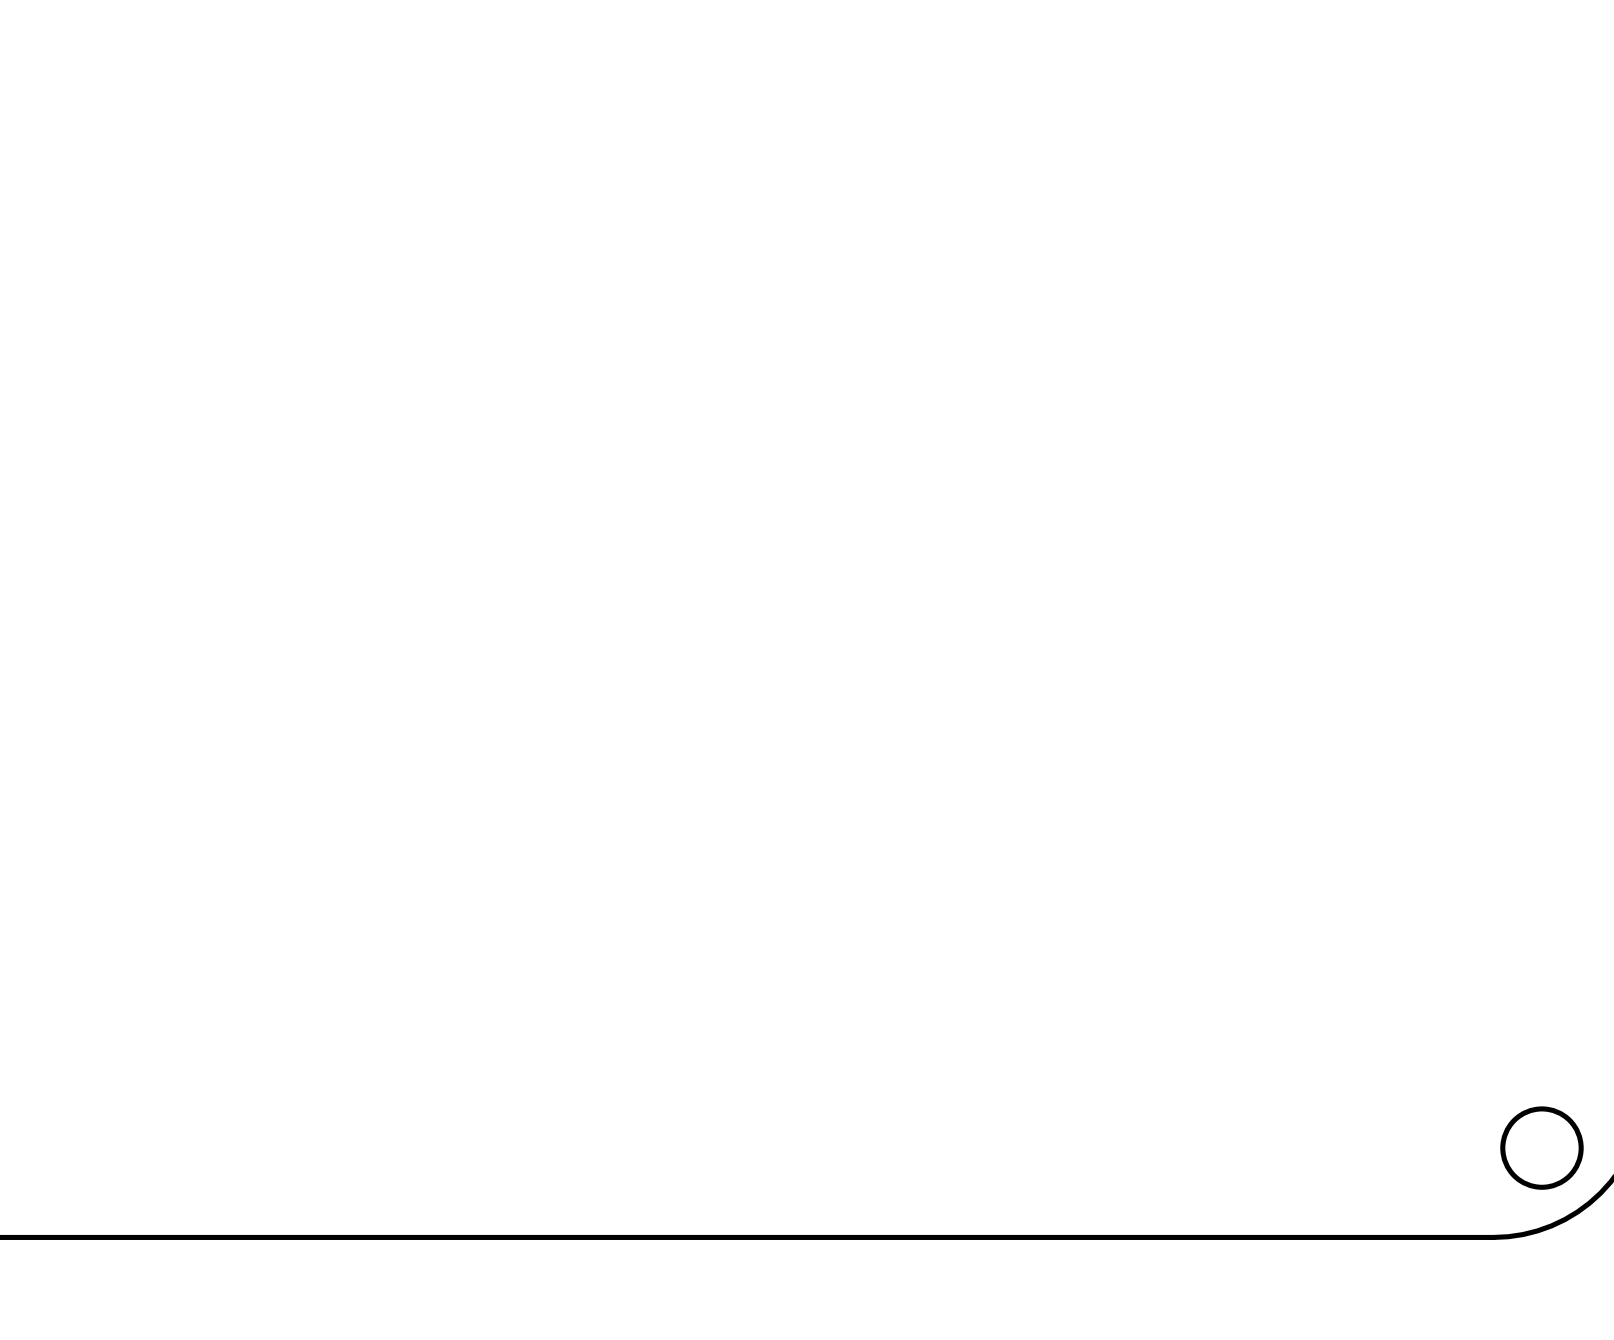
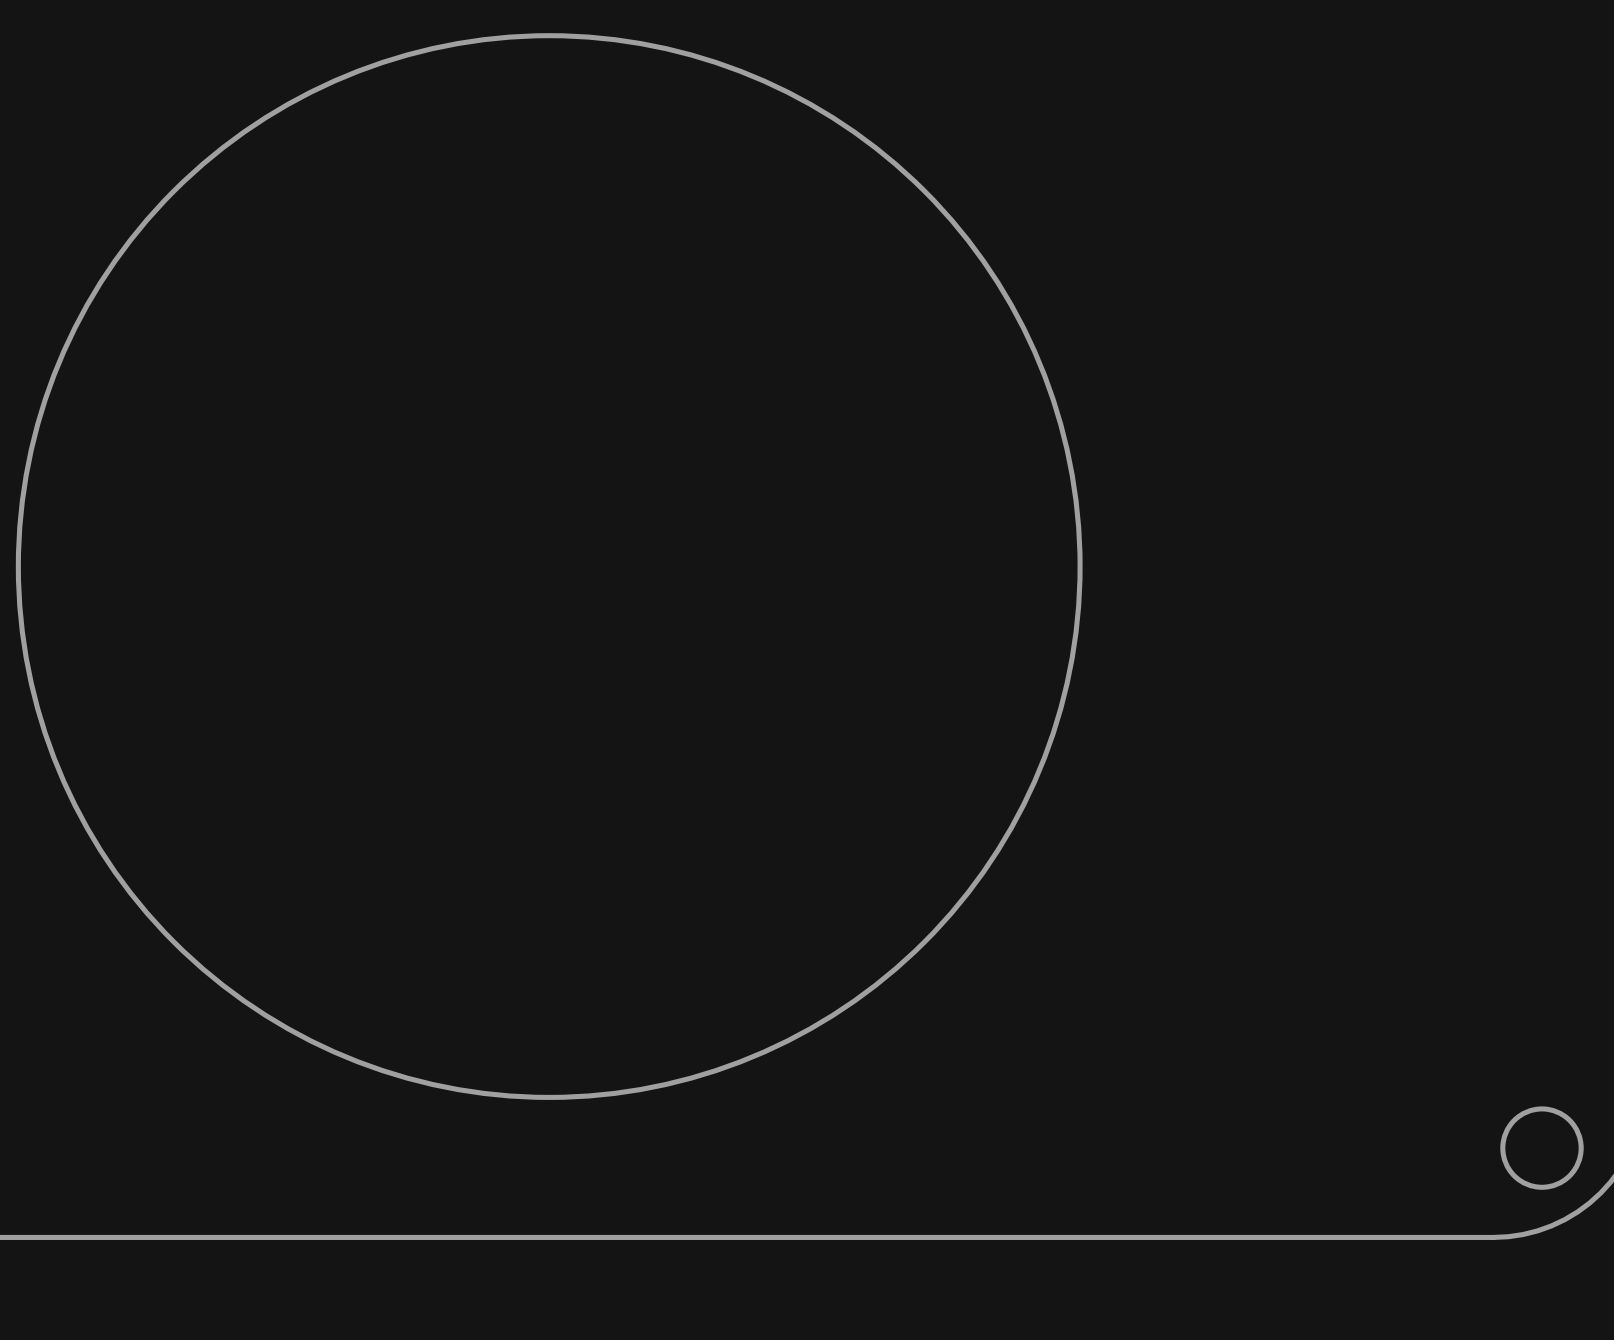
round board edge: none -> [15, 33, 1083, 1100]

